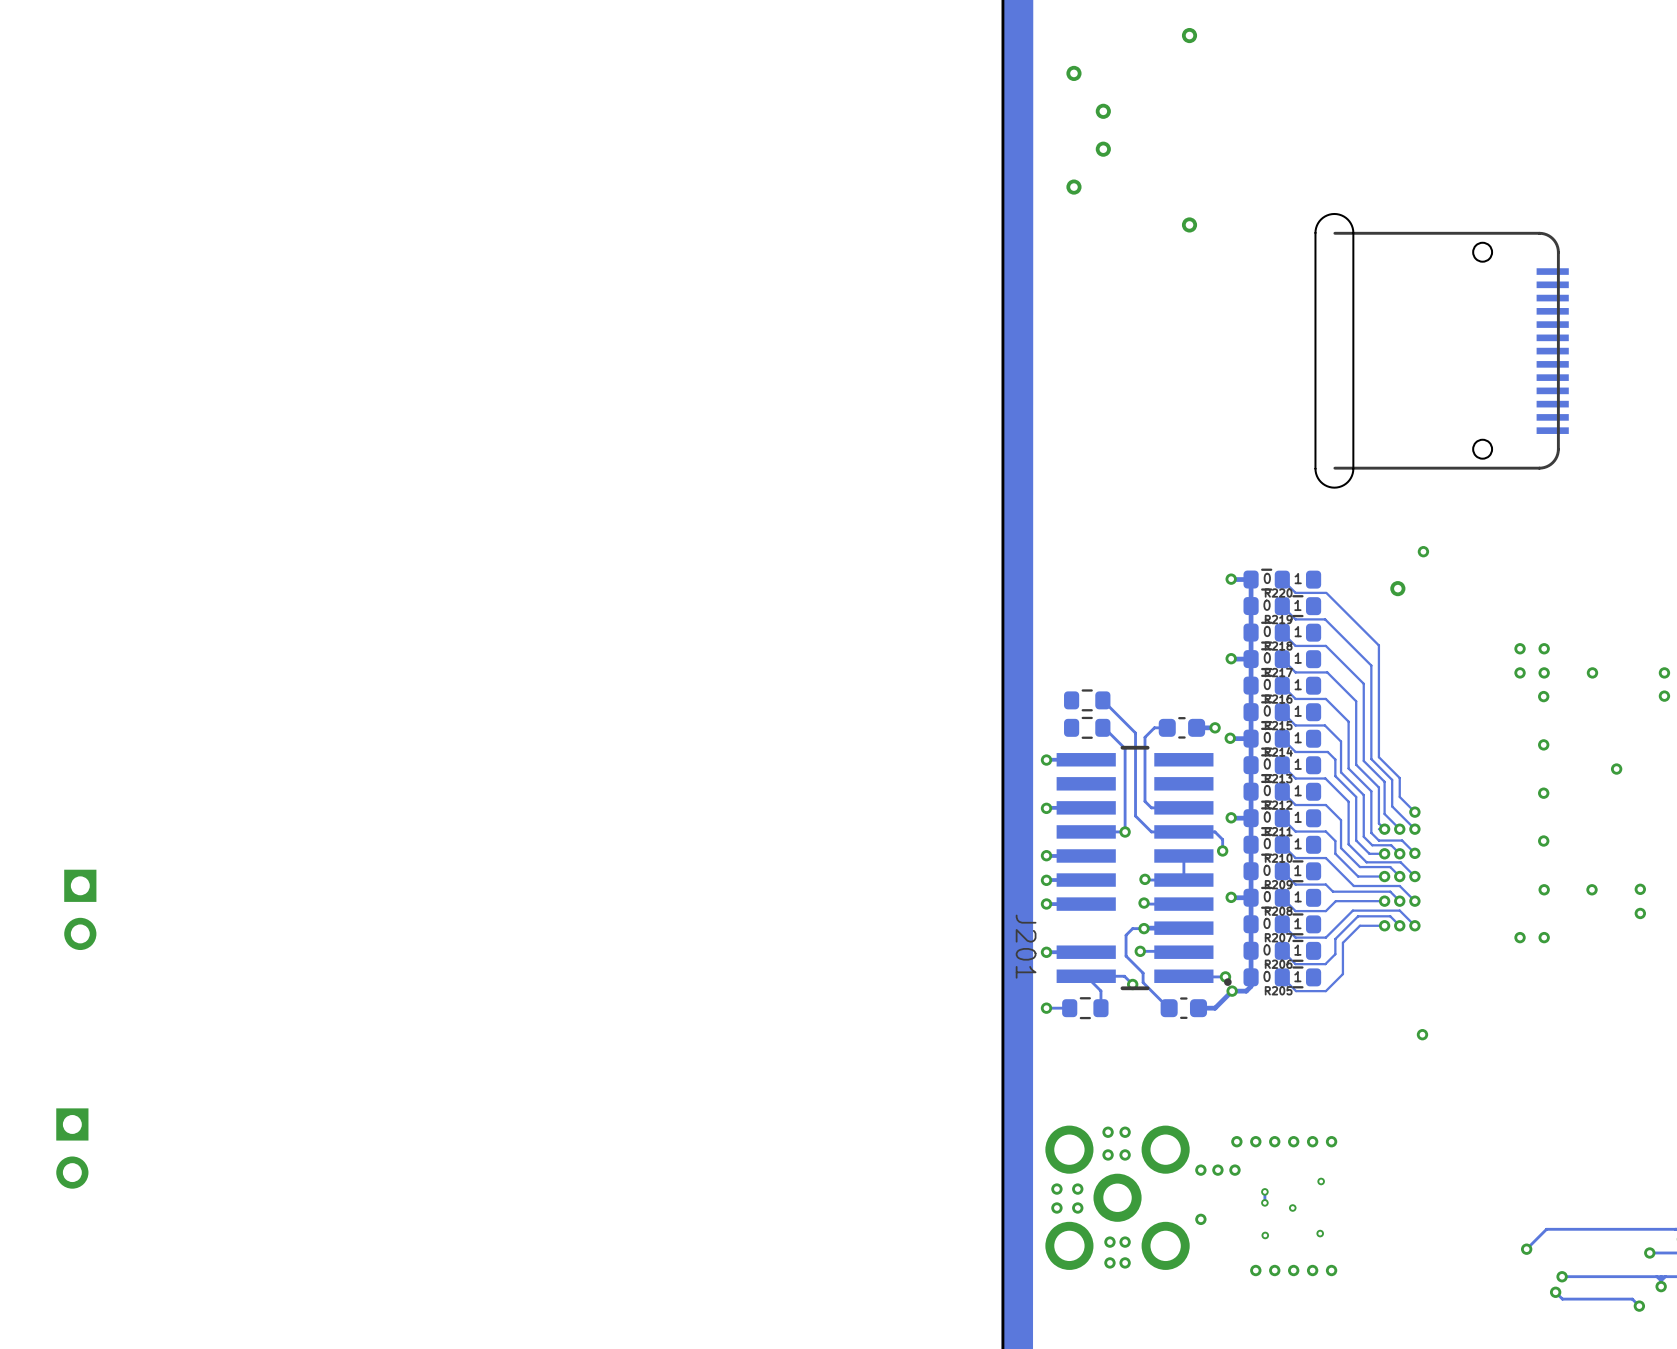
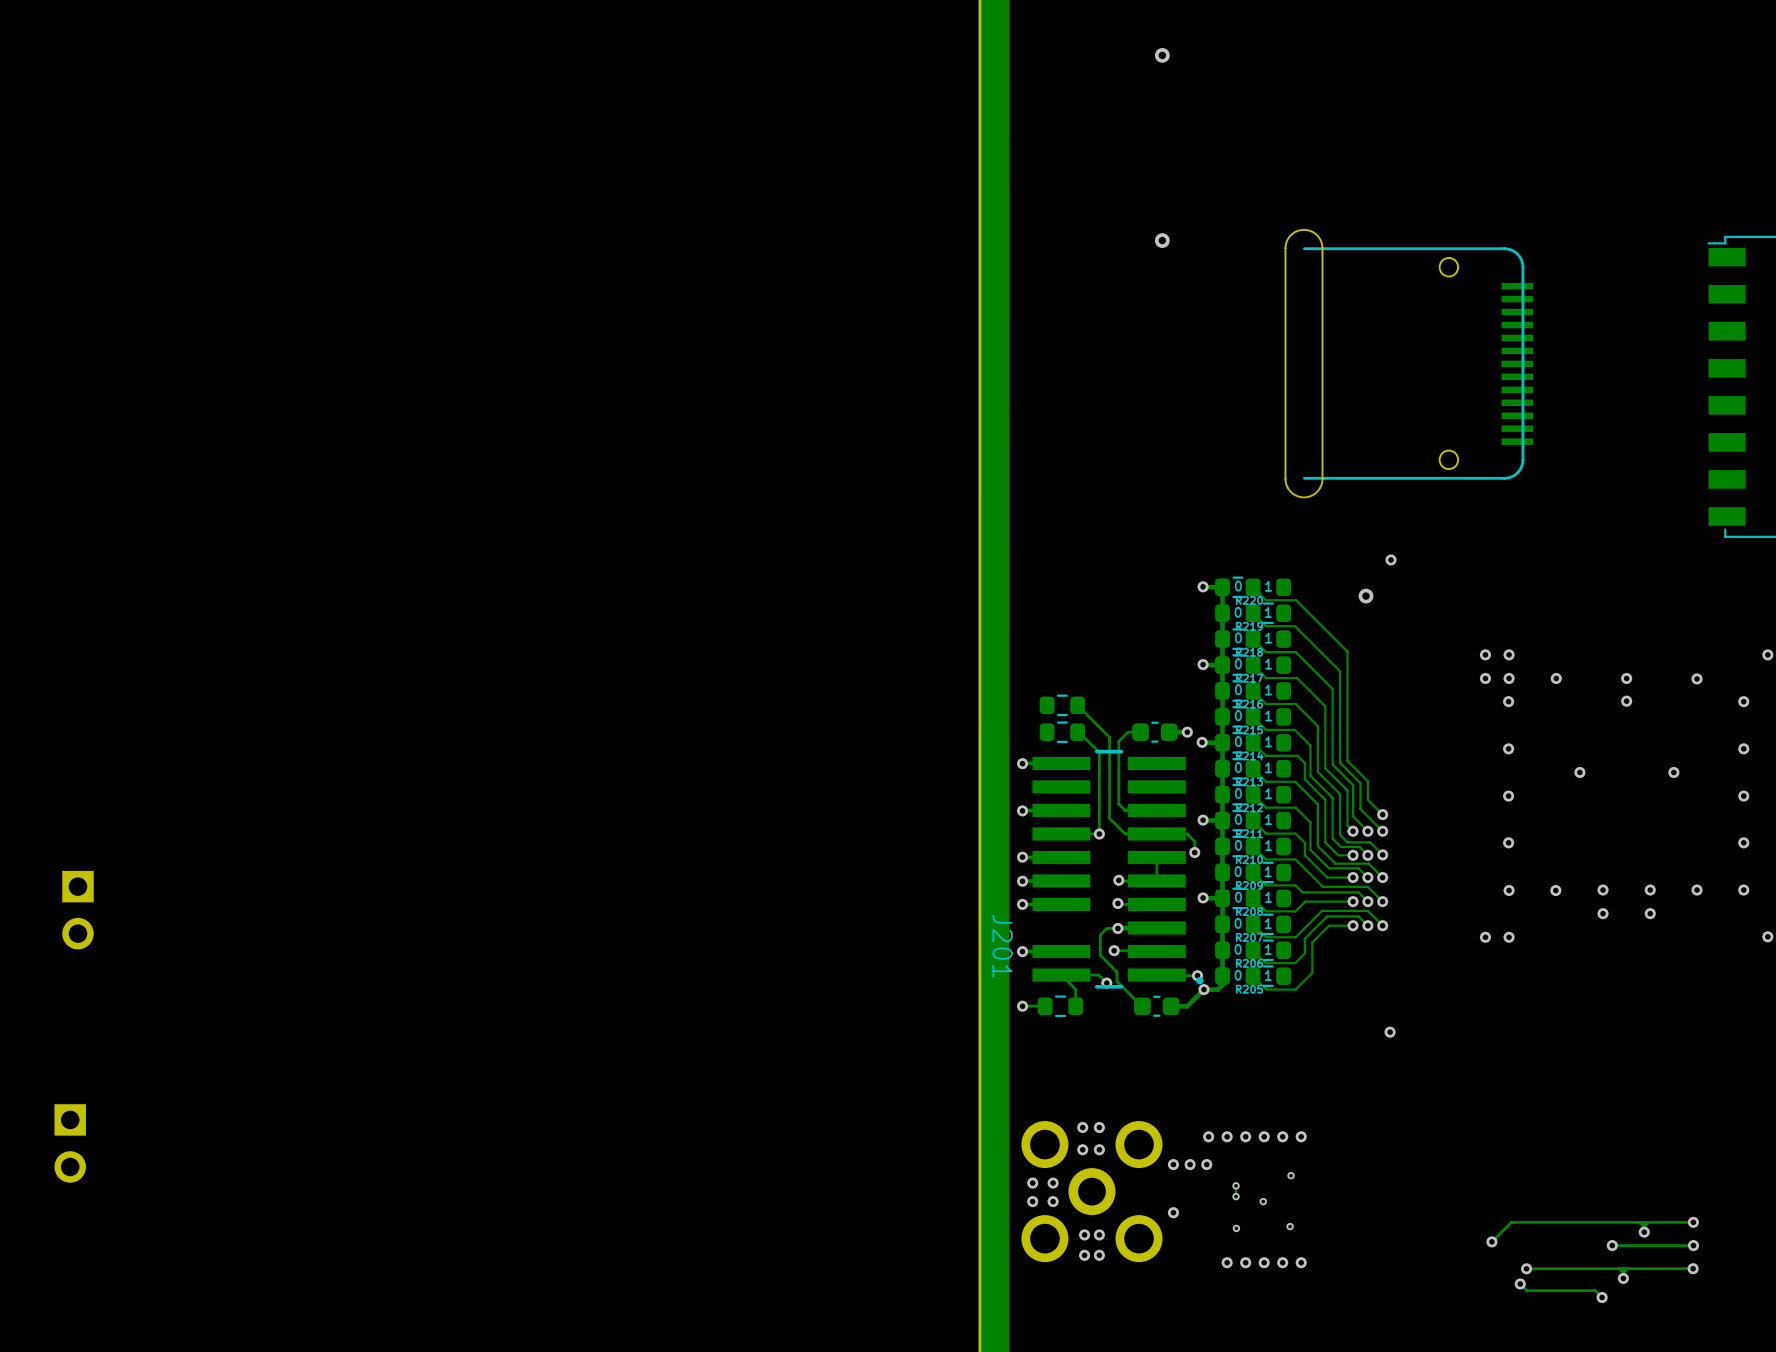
via: (1073, 73) -> none
via: (1103, 111) -> none
via: (1103, 149) -> none
via: (1073, 187) -> none

